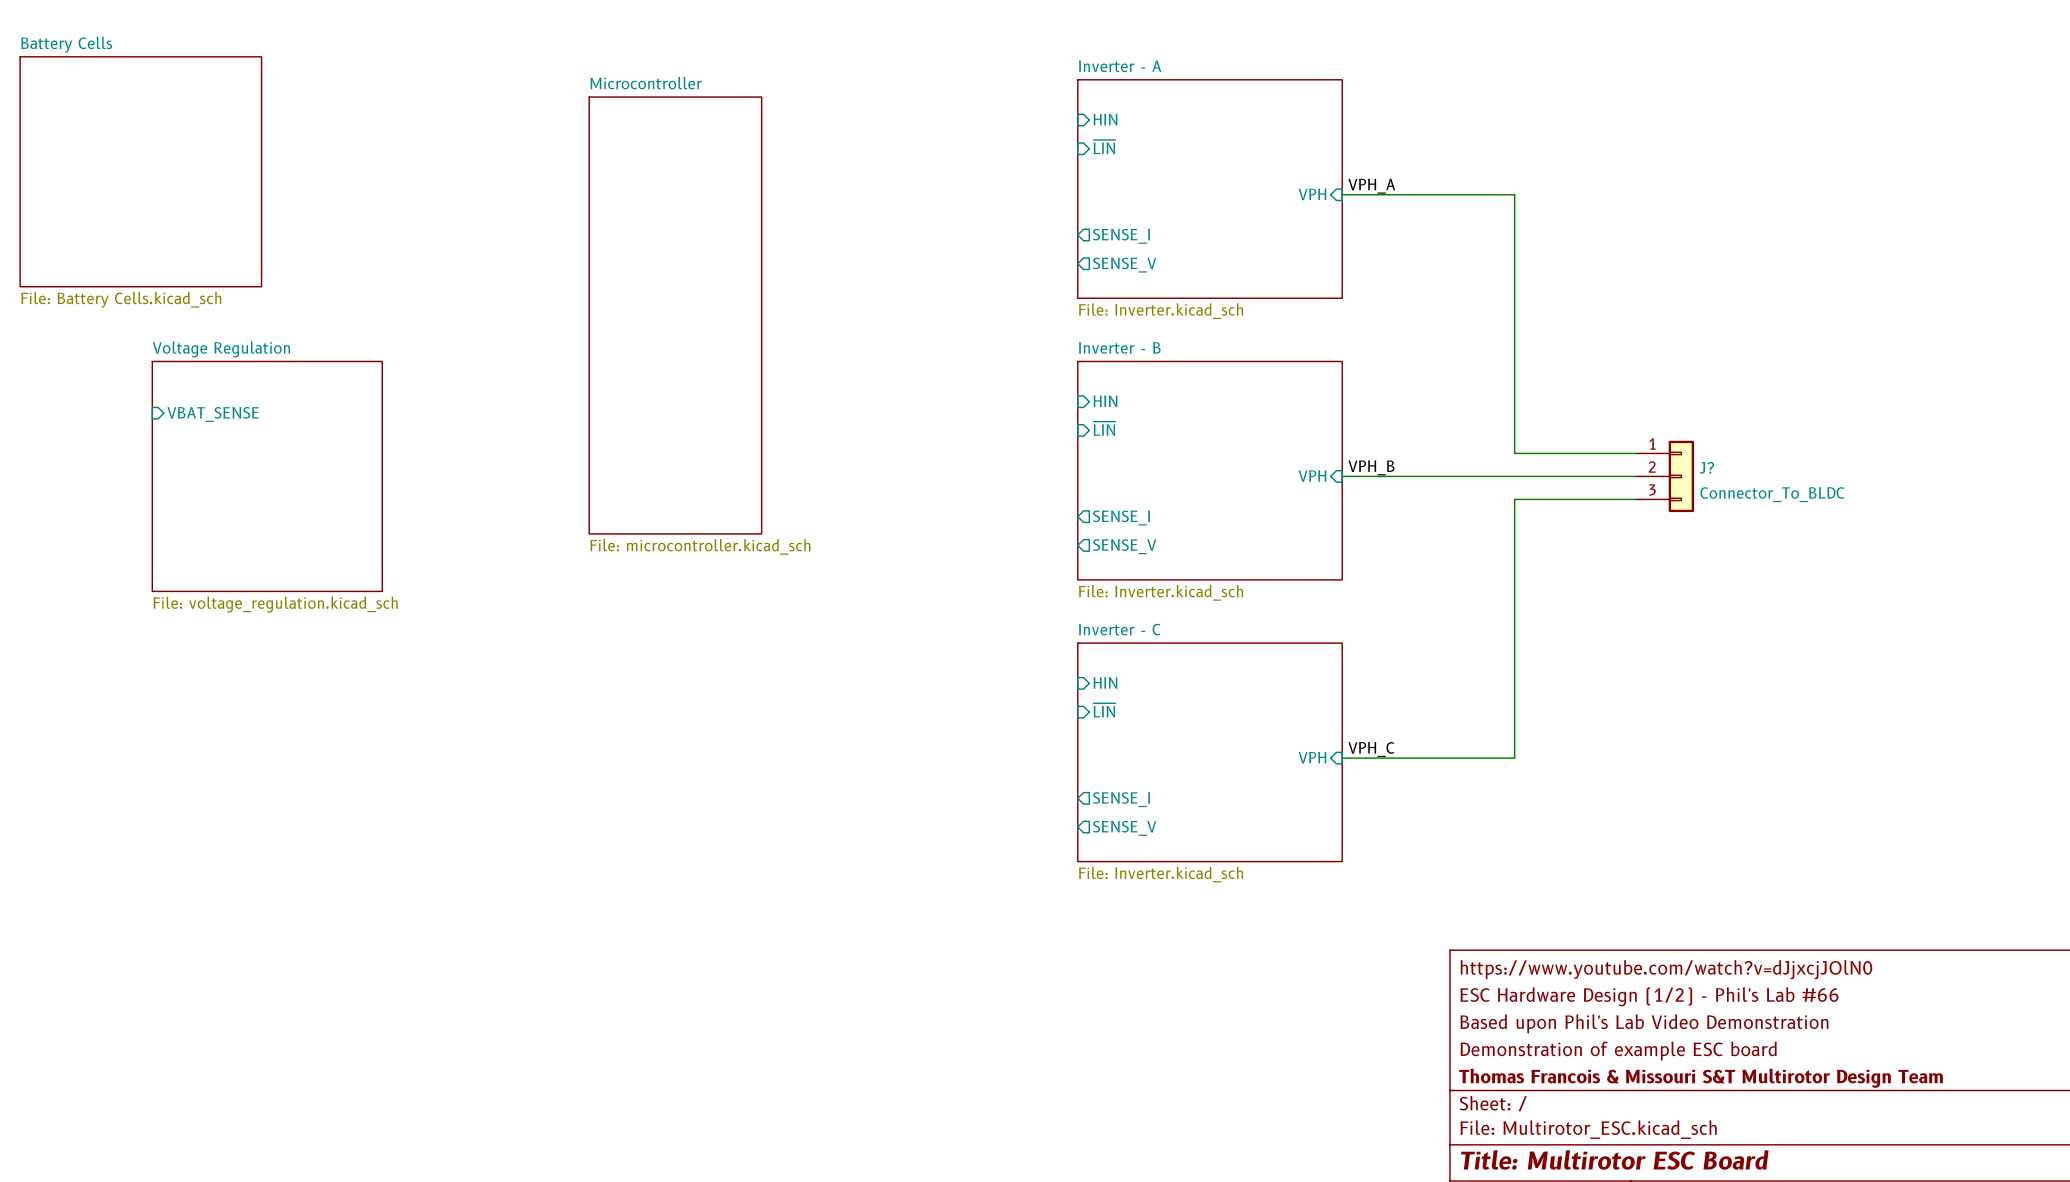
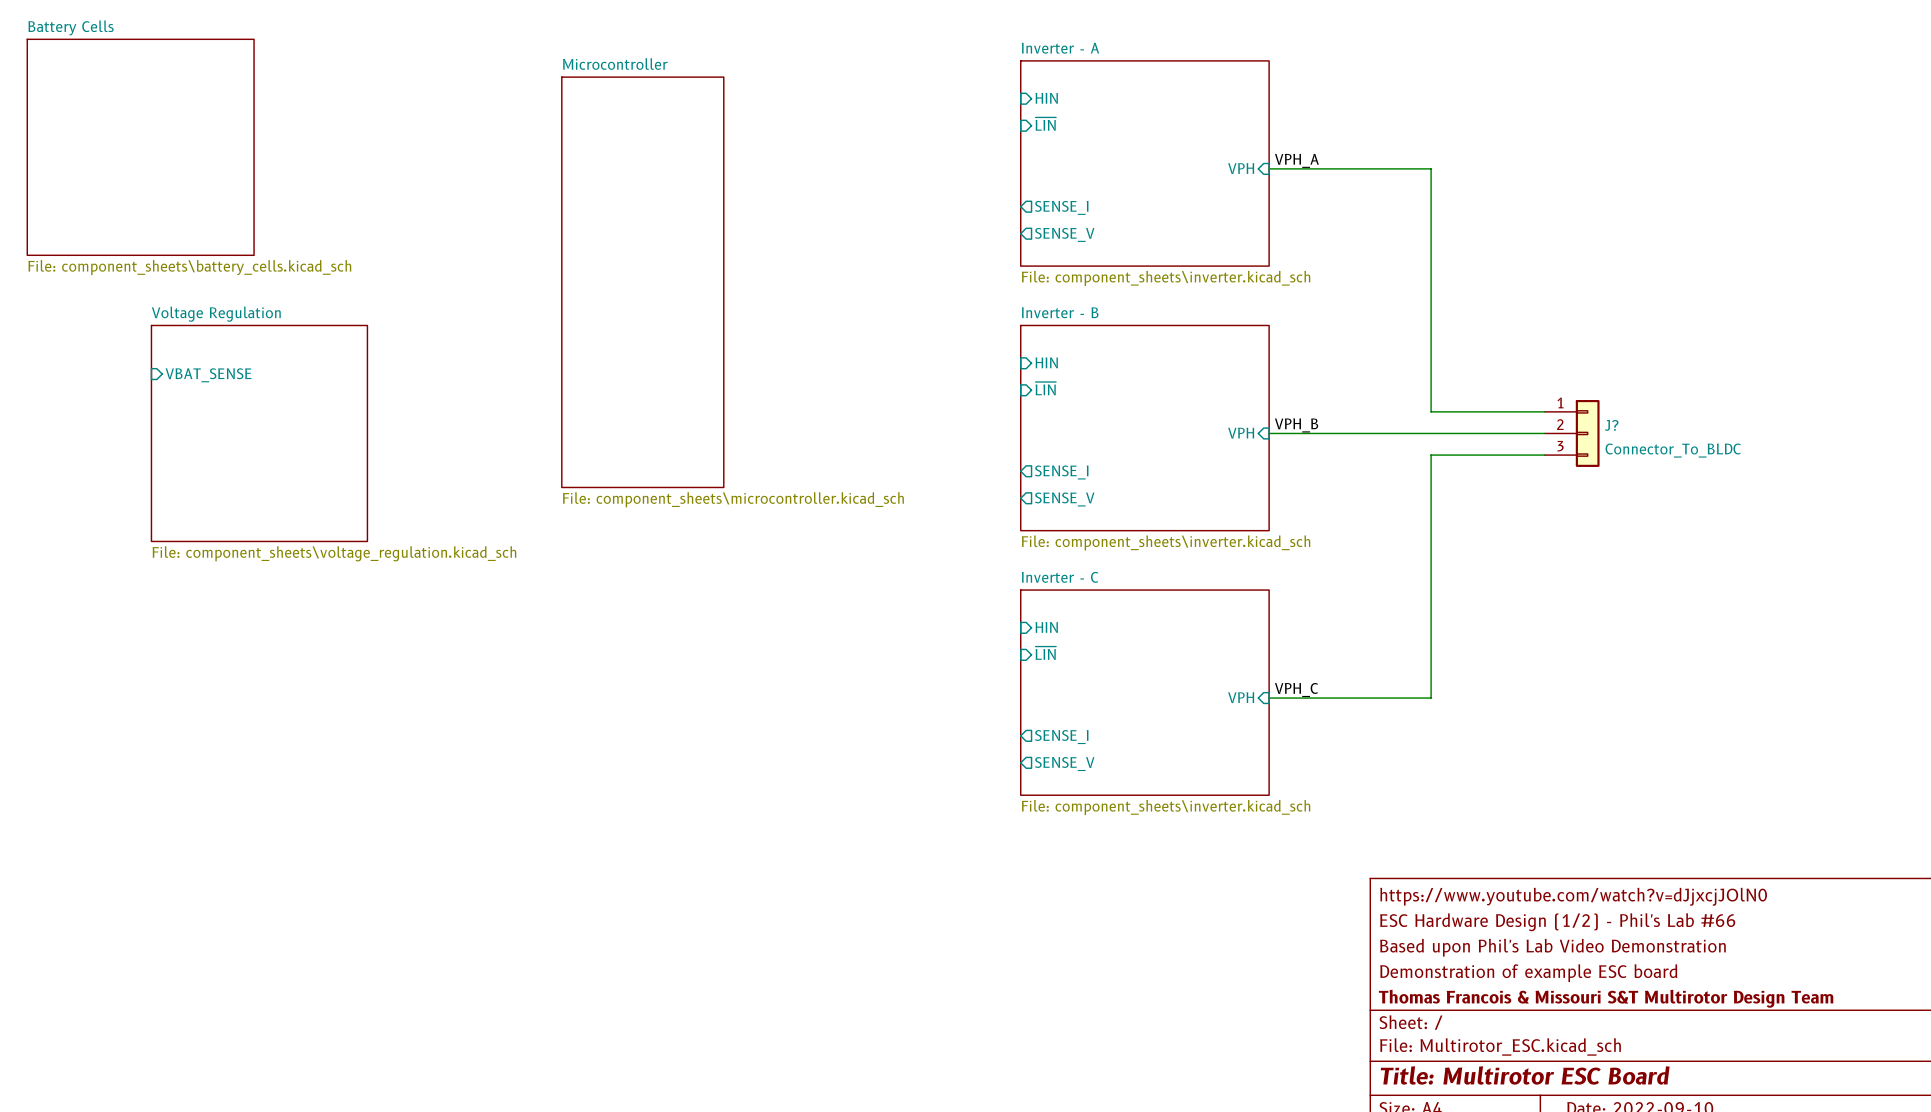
sheet Battery Cells value: File: Battery Cells.kicad_sch (121, 299) -> File: component_sheets\battery_cells.kicad_sch (189, 267)
sheet Inverter - A value: File: Inverter.kicad_sch (1161, 311) -> File: component_sheets\inverter.kicad_sch (1166, 278)
sheet Microcontroller value: File: microcontroller.kicad_sch (700, 546) -> File: component_sheets\microcontroller.kicad_sch (733, 499)
sheet Inverter - B value: File: Inverter.kicad_sch (1161, 592) -> File: component_sheets\inverter.kicad_sch (1166, 542)
sheet Voltage Regulation value: File: voltage_regulation.kicad_sch (275, 604) -> File: component_sheets\voltage_regulation.kicad_sch (334, 553)
sheet Inverter - C value: File: Inverter.kicad_sch (1161, 874) -> File: component_sheets\inverter.kicad_sch (1166, 807)

